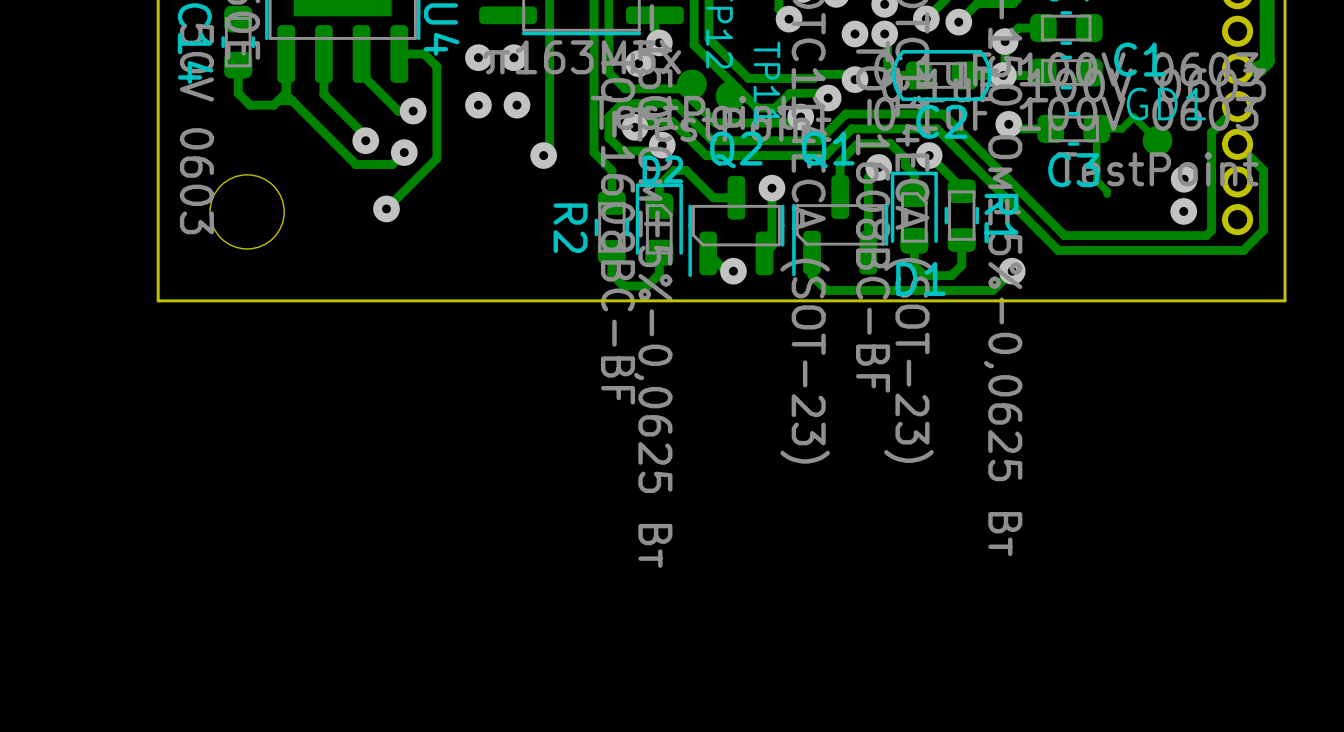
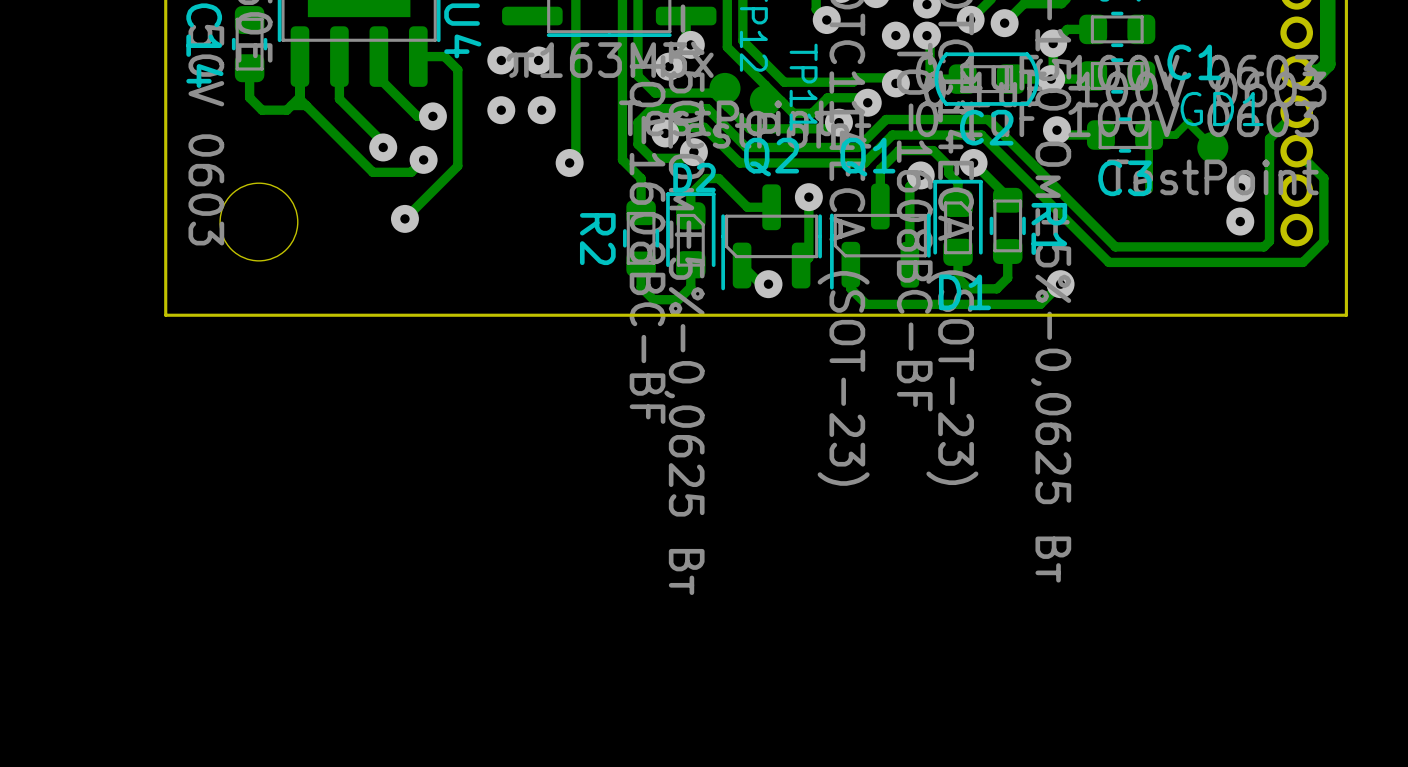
track: (1096, 180) (1107, 191) (1107, 194) -> none

